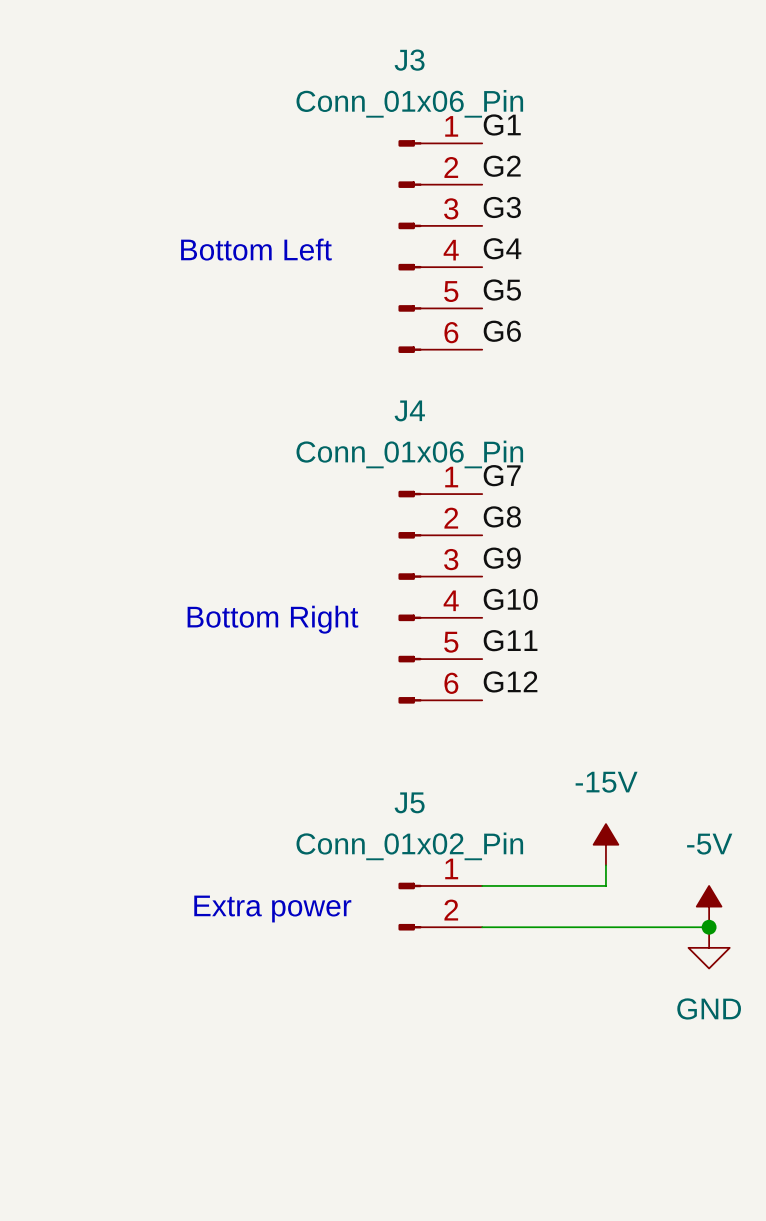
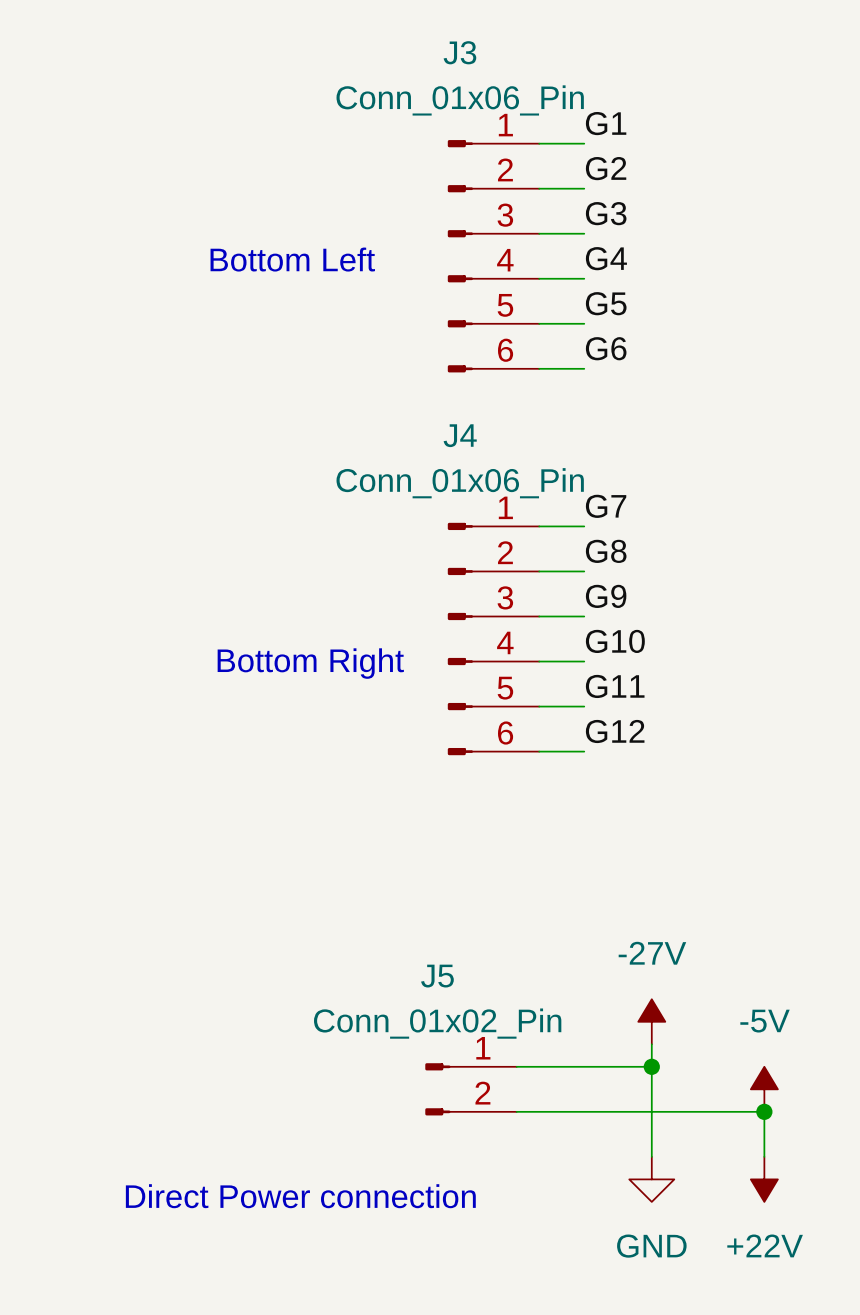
label position: G1 (502, 124) -> G1 (606, 123)
wire: none -> (539, 143) (584, 143)
label position: G2 (502, 166) -> G2 (606, 168)
wire: none -> (539, 188) (584, 188)
label position: G3 (502, 207) -> G3 (606, 213)
wire: none -> (539, 233) (584, 233)
label position: G4 (502, 248) -> G4 (606, 258)
wire: none -> (539, 278) (584, 278)
label position: G5 (502, 290) -> G5 (606, 303)
wire: none -> (539, 323) (584, 323)
label position: G6 (502, 331) -> G6 (606, 348)
wire: none -> (539, 368) (584, 368)
label position: G7 (502, 475) -> G7 (606, 506)
wire: none -> (539, 526) (584, 526)
label position: G8 (502, 516) -> G8 (606, 551)
wire: none -> (539, 571) (584, 571)
label position: G9 (502, 558) -> G9 (606, 596)
wire: none -> (539, 616) (584, 616)
label position: G10 (510, 599) -> G10 (615, 641)
wire: none -> (539, 661) (584, 661)
label position: G11 (510, 640) -> G11 (615, 686)
wire: none -> (539, 706) (584, 706)
label position: G12 (510, 681) -> G12 (615, 731)
wire: none -> (539, 751) (584, 751)
power symbol: -15V (605, 844) -> none
wire: (605, 865) (605, 885) (482, 885) -> none
J5 position: (440, 906) -> (470, 1089)
power symbol position: -5V (709, 906) -> -5V (764, 1089)
text: Extra power (272, 909) -> none
wire: (482, 927) (709, 927) -> none
junction: (709, 927) -> none
power symbol: none -> -27V (651, 1021)
power symbol position: GND (709, 947) -> GND (651, 1179)
wire: none -> (651, 1044) (651, 1156)
wire: none -> (516, 1066) (651, 1066)
junction: none -> (651, 1066)
wire: none -> (516, 1111) (764, 1111) (764, 1156)
junction: none -> (764, 1111)
power symbol: none -> +22V (764, 1179)
text: none -> Direct Power connection (300, 1196)

